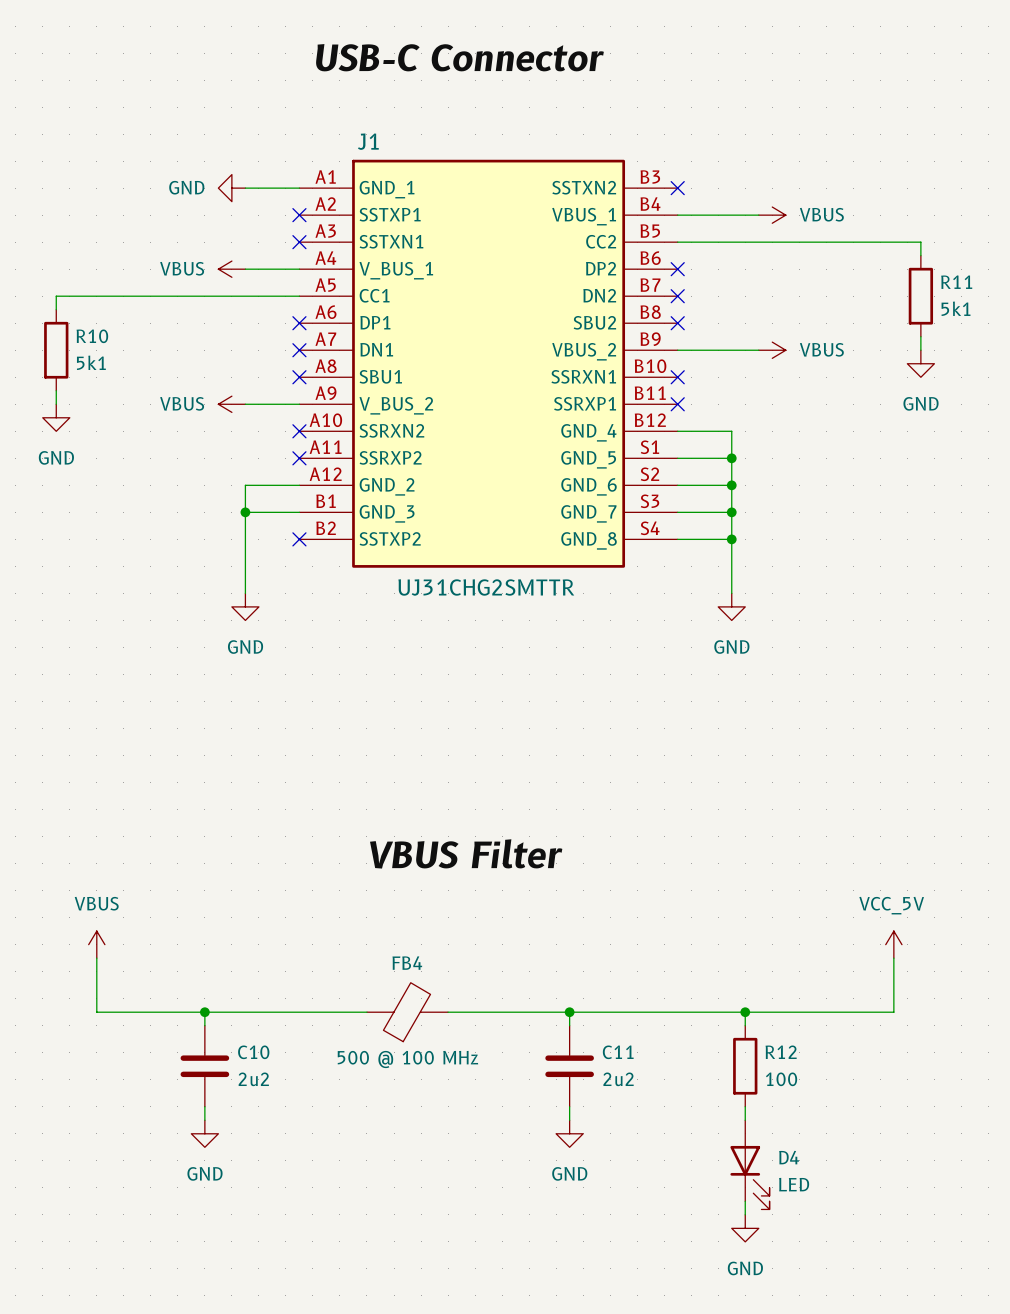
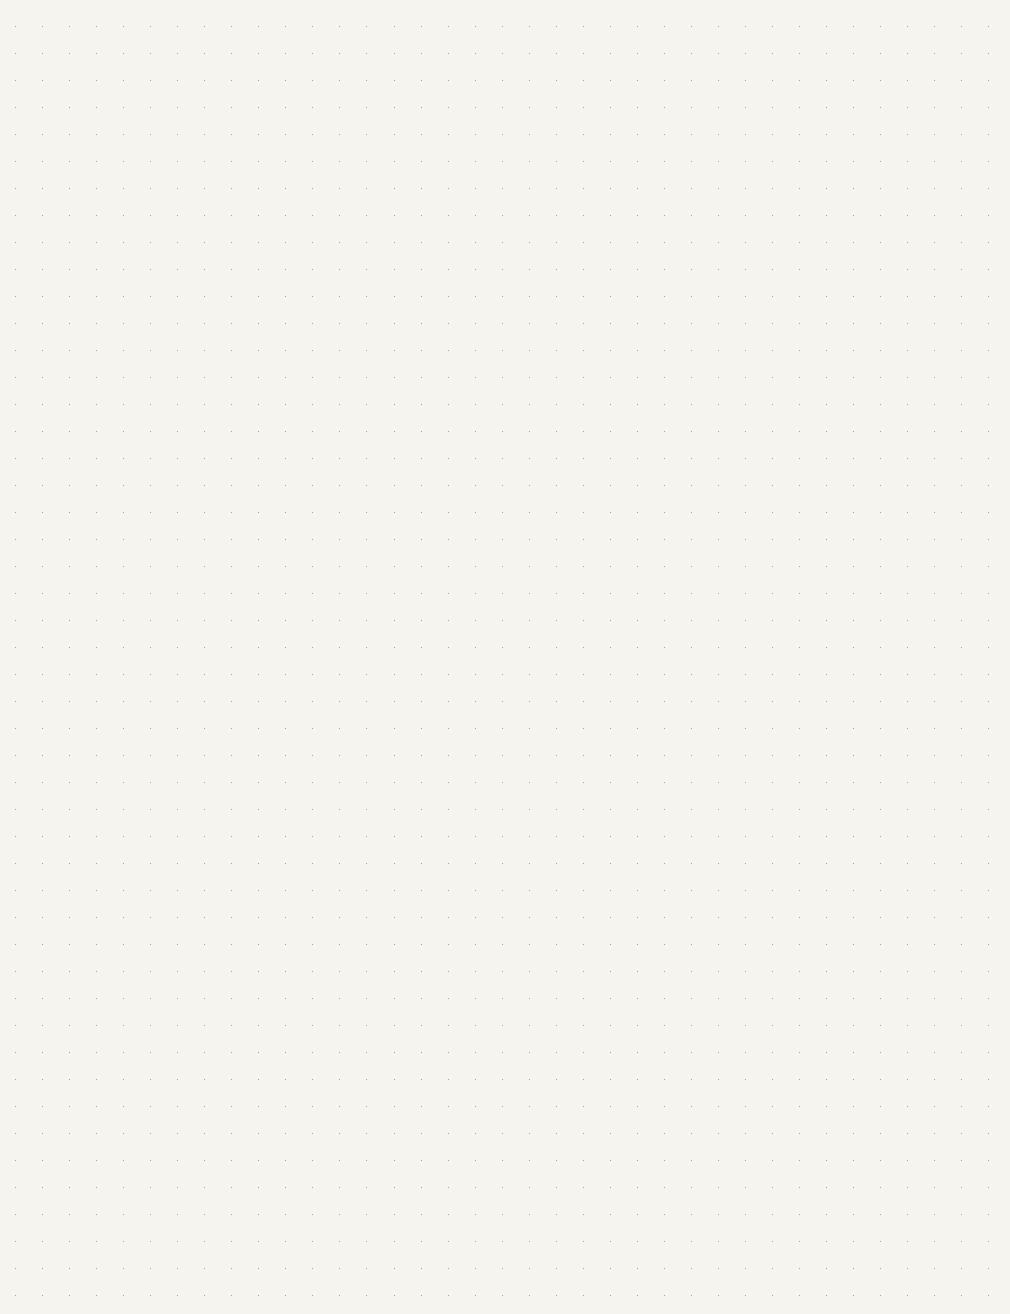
label: USB-C Connector (459, 57) -> none
power symbol: GND (231, 188) -> none
wire: (245, 188) (299, 188) -> none
no-connect mark: (677, 188) -> none
no-connect mark: (299, 215) -> none
wire: (677, 215) (758, 215) -> none
power symbol: VBUS (772, 215) -> none
no-connect mark: (299, 242) -> none
wire: (677, 242) (920, 242) (920, 255) -> none
power symbol: VBUS (231, 269) -> none
wire: (245, 269) (299, 269) -> none
no-connect mark: (677, 269) -> none
wire: (299, 296) (56, 296) (56, 309) -> none
no-connect mark: (677, 296) -> none
R11: 5k1 (920, 296) -> none
no-connect mark: (299, 323) -> none
no-connect mark: (677, 323) -> none
wire: (920, 336) (920, 350) -> none
R10: 5k1 (56, 350) -> none
no-connect mark: (299, 350) -> none
wire: (677, 350) (758, 350) -> none
power symbol: VBUS (772, 350) -> none
J1: UJ31CHG2SMTTR (488, 363) -> none
power symbol: GND (920, 363) -> none
no-connect mark: (299, 377) -> none
no-connect mark: (677, 377) -> none
wire: (56, 390) (56, 404) -> none
power symbol: VBUS (231, 404) -> none
wire: (245, 404) (299, 404) -> none
no-connect mark: (677, 404) -> none
power symbol: GND (56, 417) -> none
no-connect mark: (299, 431) -> none
wire: (677, 431) (731, 431) (731, 593) -> none
no-connect mark: (299, 458) -> none
wire: (677, 458) (731, 458) -> none
junction: (731, 458) -> none
wire: (299, 485) (245, 485) (245, 593) -> none
wire: (677, 485) (731, 485) -> none
junction: (731, 485) -> none
wire: (245, 512) (299, 512) -> none
junction: (245, 512) -> none
wire: (677, 512) (731, 512) -> none
junction: (731, 512) -> none
no-connect mark: (299, 539) -> none
wire: (677, 539) (731, 539) -> none
junction: (731, 539) -> none
power symbol: GND (245, 606) -> none
power symbol: GND (731, 606) -> none
label: VBUS Filter (466, 853) -> none
power symbol: VBUS (96, 944) -> none
power symbol: VCC_5V (893, 944) -> none
wire: (96, 958) (96, 1012) (366, 1012) -> none
wire: (893, 958) (893, 1012) (448, 1012) -> none
wire: (204, 1012) (204, 1025) -> none
junction: (204, 1012) -> none
FB4: 500 @ 100 MHz (407, 1012) -> none
wire: (569, 1012) (569, 1025) -> none
junction: (569, 1012) -> none
wire: (745, 1012) (745, 1025) -> none
junction: (745, 1012) -> none
C10: 2u2 (204, 1066) -> none
C11: 2u2 (569, 1066) -> none
R12: 100 (745, 1066) -> none
wire: (204, 1106) (204, 1120) -> none
wire: (569, 1106) (569, 1120) -> none
wire: (745, 1106) (745, 1120) -> none
power symbol: GND (204, 1133) -> none
power symbol: GND (569, 1133) -> none
D4: LED (749, 1164) -> none
wire: (745, 1201) (745, 1214) -> none
power symbol: GND (745, 1228) -> none

